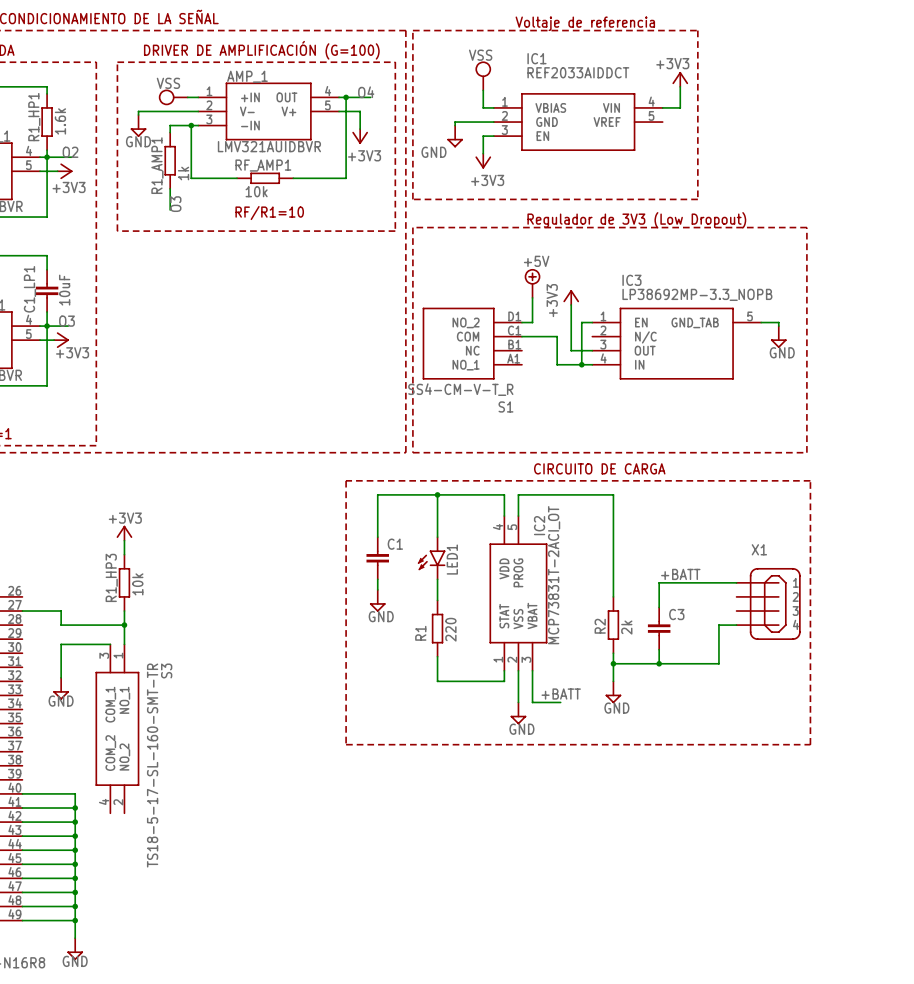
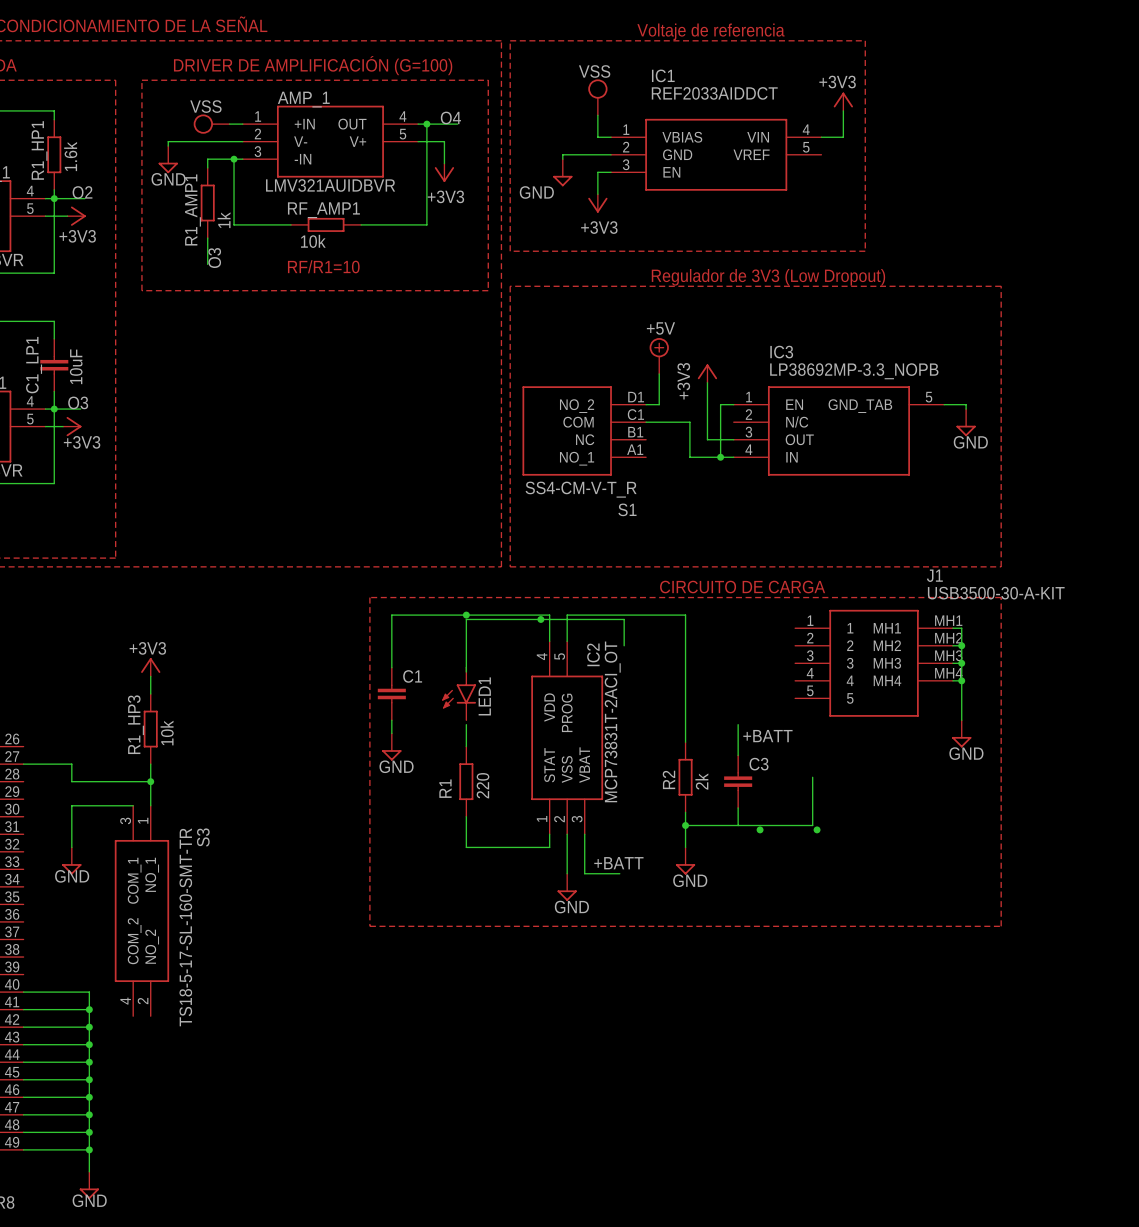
line: (346, 480) (810, 480) (810, 744) (346, 744) (346, 480) -> (369, 597) (369, 926) (1001, 926) (1001, 597) (369, 597)
junction: none -> (466, 615)
wire: (437, 494) (437, 537) -> none
wire: none -> (952, 628) (961, 628) (961, 720)
wire: none -> (549, 641) (549, 615) (391, 615) (391, 667)
wire: (518, 516) (518, 494) (613, 494) (613, 596) -> (567, 641) (567, 615) (685, 615) (685, 742)
wire: none -> (952, 645) (961, 645)
junction: none -> (961, 645)
J1: none -> USB3500-30-A-KIT (874, 663)
wire: none -> (952, 663) (961, 663)
junction: none -> (961, 663)
wire: none -> (952, 680) (961, 680)
junction: none -> (961, 680)
C1 position: (377, 558) -> (391, 693)
LED1 position: (431, 558) -> (459, 693)
label: +BATT (680, 574) -> none
wire: none -> (391, 720) (391, 733)
wire: (437, 579) (437, 600) -> none
wire: none -> (738, 724) (738, 755)
wire: (736, 582) (659, 582) (659, 607) -> none
power symbol: none -> GND (961, 733)
label: none -> +BATT (767, 736)
IC2 position: (518, 593) -> (567, 737)
power symbol position: GND (377, 600) -> GND (391, 747)
X1: (768, 603) -> none
wire: none -> (812, 777) (812, 825) (685, 825)
R2 position: (613, 625) -> (685, 777)
wire: (736, 625) (718, 625) (718, 663) (613, 663) -> none
R1 position: (437, 628) -> (466, 781)
C3 position: (659, 628) -> (738, 781)
wire: (659, 649) (659, 663) -> (738, 807) (738, 825)
wire: (613, 653) (613, 681) -> (685, 812) (685, 847)
wire: (437, 656) (437, 681) (504, 681) (504, 670) -> (466, 816) (466, 847) (549, 847) (549, 834)
junction: none -> (685, 825)
wire: (518, 670) (518, 702) -> (567, 834) (567, 873)
wire: (532, 670) (532, 702) (560, 702) -> (584, 834) (584, 873) (619, 873)
power symbol: none -> GND (685, 861)
power symbol: GND (613, 692) -> none
label position: +BATT (561, 694) -> +BATT (618, 863)
power symbol: none -> GND (567, 887)
power symbol: GND (518, 713) -> none

